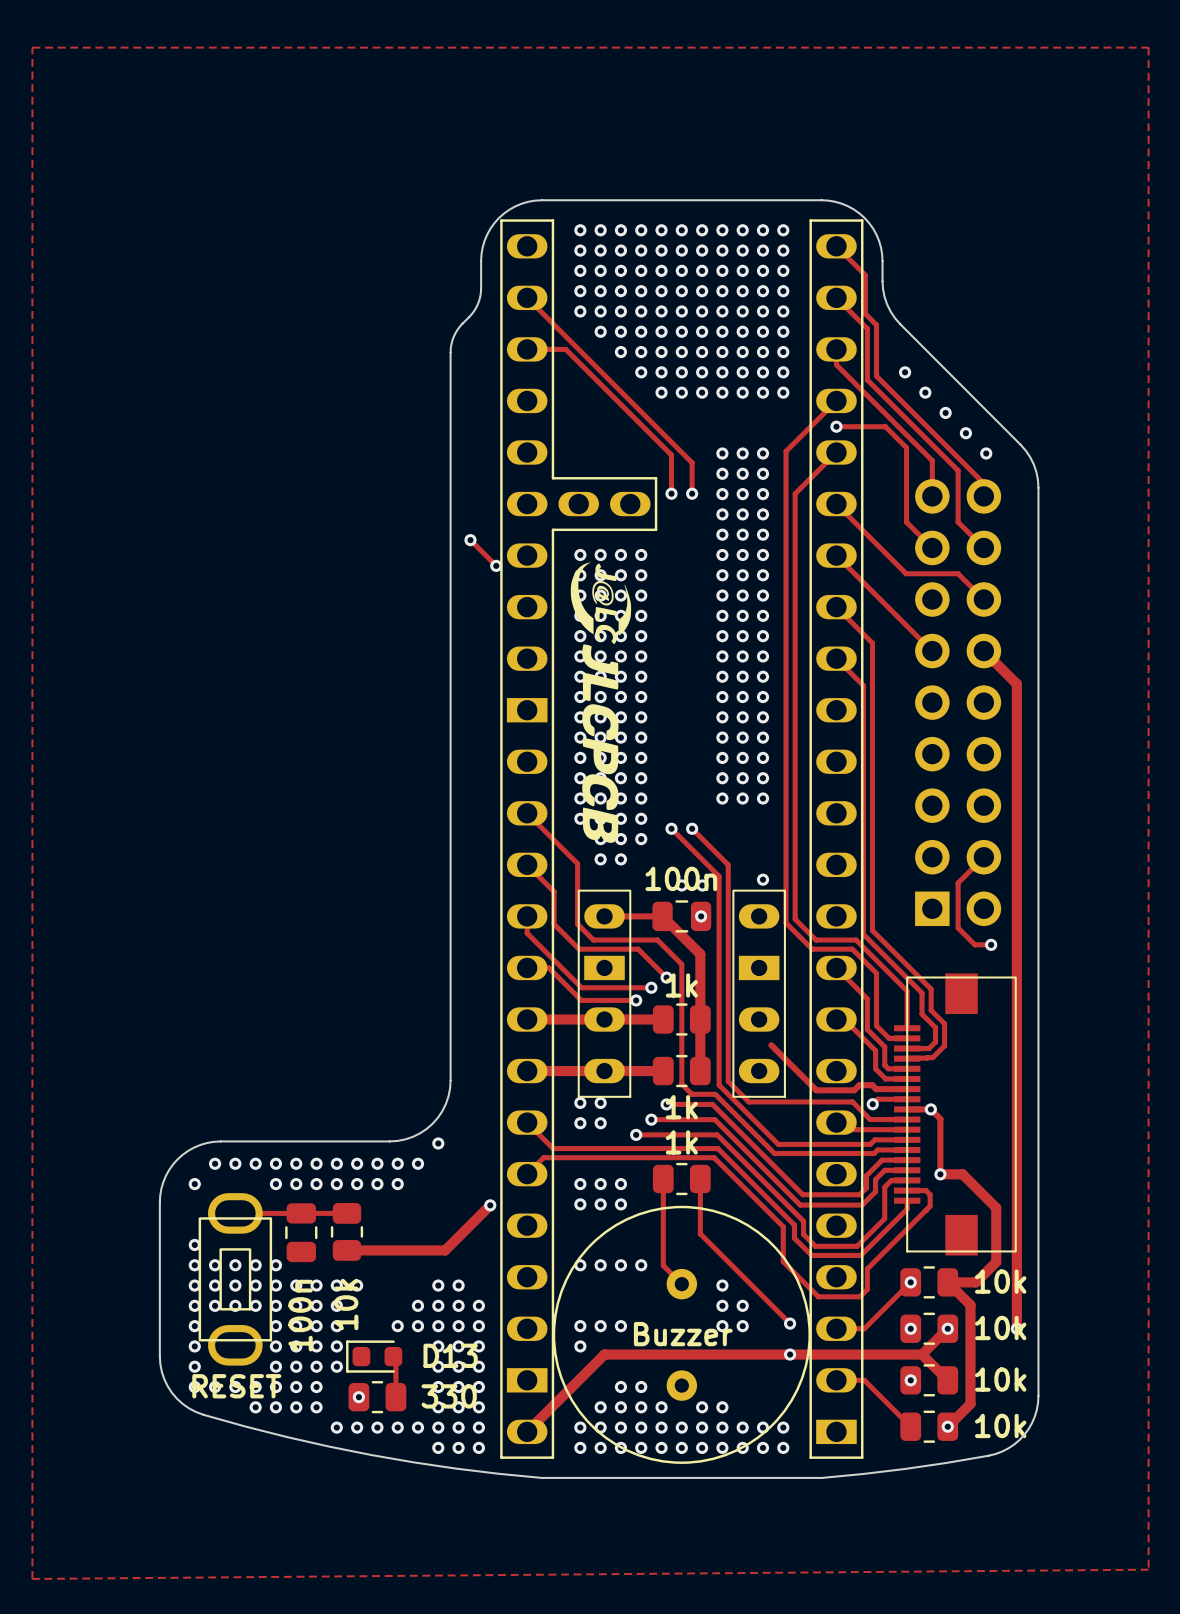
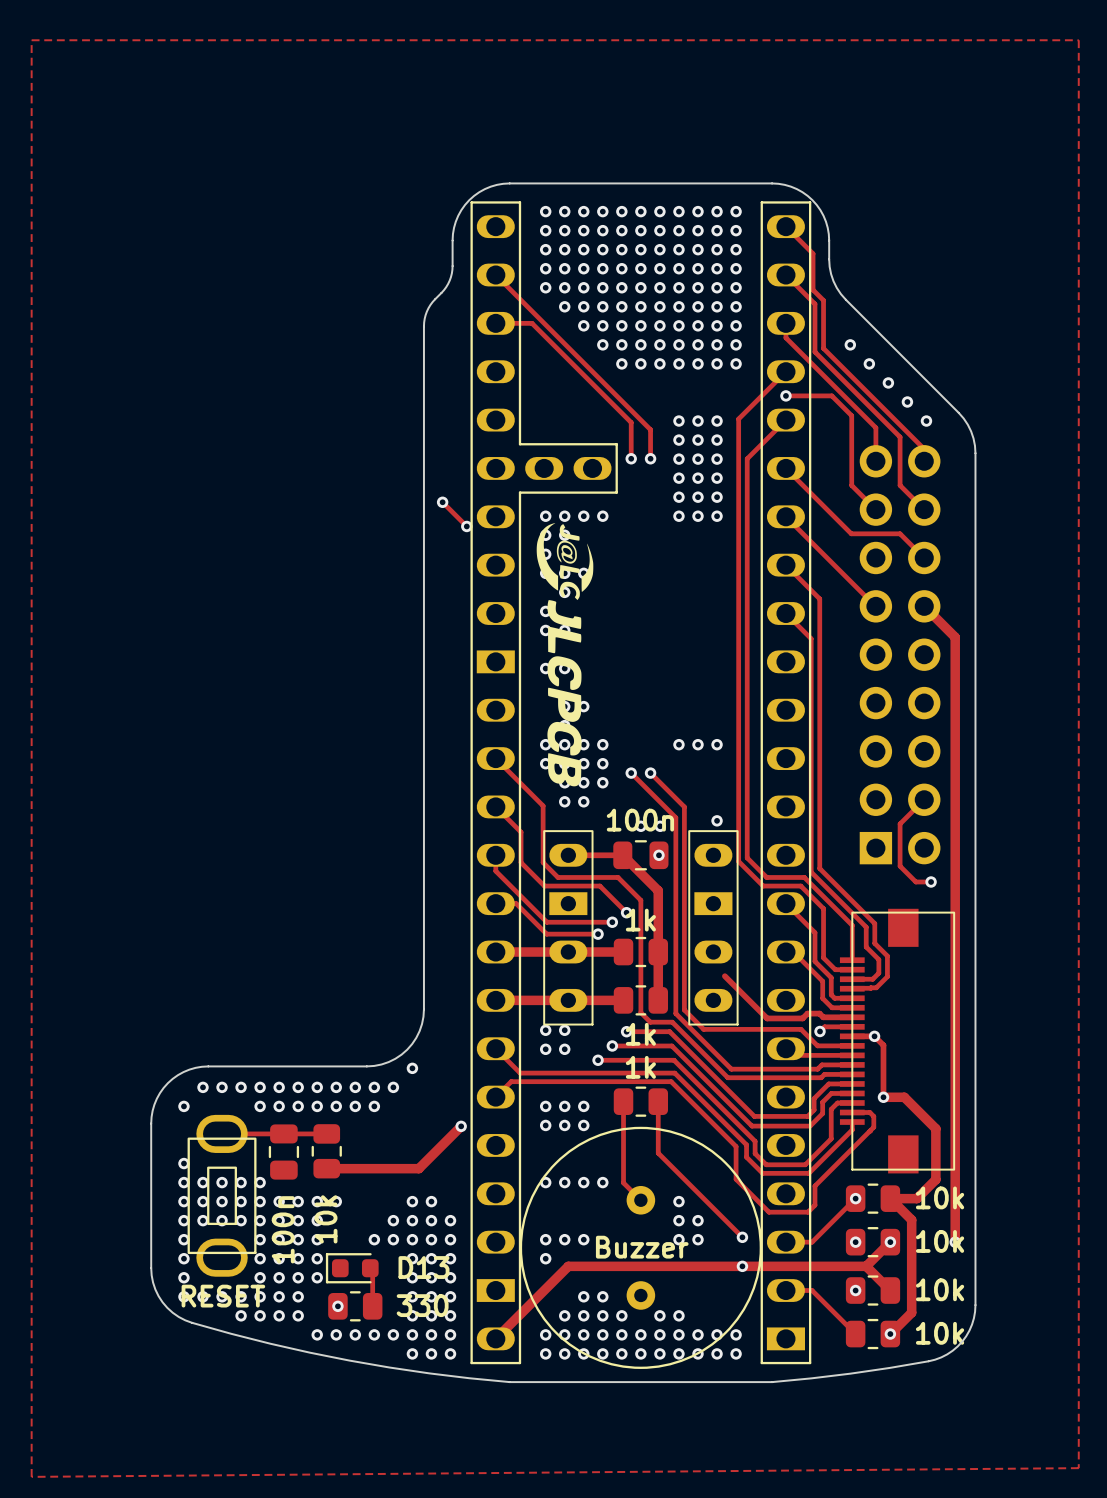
via: (620, 575) -> none
via: (641, 575) -> none
via: (722, 575) -> none
via: (742, 575) -> none
via: (763, 575) -> none
via: (600, 595) -> none
via: (620, 595) -> none
via: (641, 595) -> none
via: (722, 595) -> none
via: (742, 595) -> none
via: (763, 595) -> none
via: (641, 615) -> none
via: (722, 615) -> none
via: (742, 615) -> none
via: (763, 615) -> none
via: (580, 636) -> none
via: (620, 636) -> none
via: (641, 636) -> none
via: (722, 636) -> none
via: (742, 636) -> none
via: (763, 636) -> none
via: (600, 656) -> none
via: (620, 656) -> none
via: (641, 656) -> none
via: (722, 656) -> none
via: (742, 656) -> none
via: (763, 656) -> none
via: (620, 676) -> none
via: (641, 676) -> none
via: (722, 676) -> none
via: (742, 676) -> none
via: (763, 676) -> none
via: (580, 697) -> none
via: (600, 697) -> none
via: (620, 697) -> none
via: (641, 697) -> none
via: (722, 697) -> none
via: (742, 697) -> none
via: (763, 697) -> none
via: (620, 717) -> none
via: (641, 717) -> none
via: (722, 717) -> none
via: (742, 717) -> none
via: (763, 717) -> none
via: (580, 737) -> none
via: (600, 737) -> none
via: (620, 737) -> none
via: (641, 737) -> none
via: (722, 737) -> none
via: (742, 737) -> none
via: (763, 737) -> none
via: (580, 757) -> none
via: (641, 757) -> none
via: (722, 757) -> none
via: (742, 757) -> none
via: (763, 757) -> none
via: (580, 778) -> none
via: (620, 778) -> none
via: (641, 778) -> none
via: (722, 778) -> none
via: (742, 778) -> none
via: (763, 778) -> none

